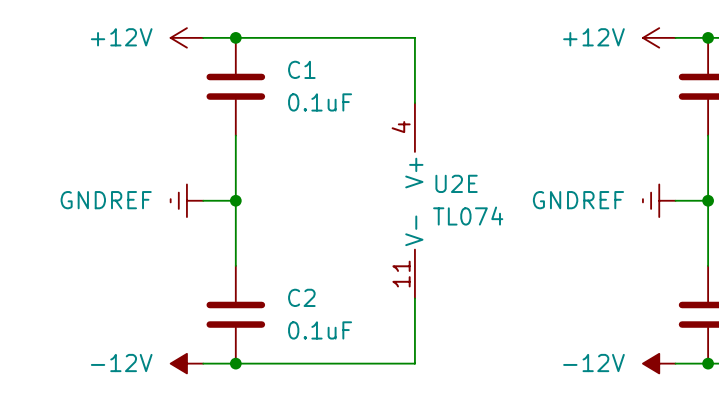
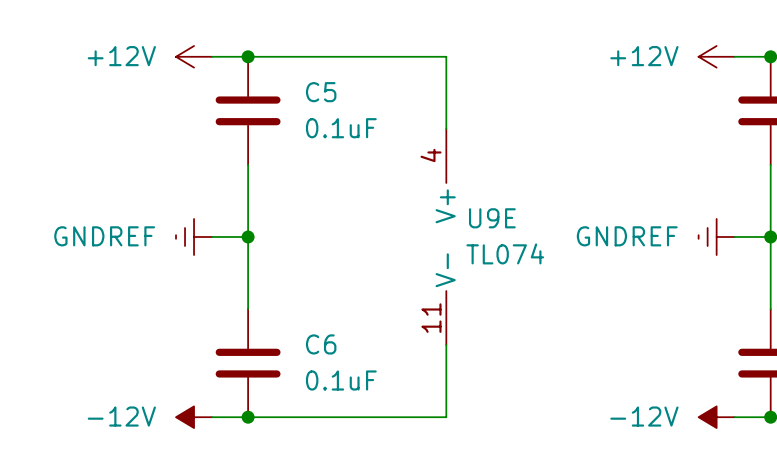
C1 name: C1 (301, 69) -> C5 (321, 92)
U2E name: U2E (456, 183) -> U9E (492, 218)
C2 name: C2 (301, 297) -> C6 (321, 344)

